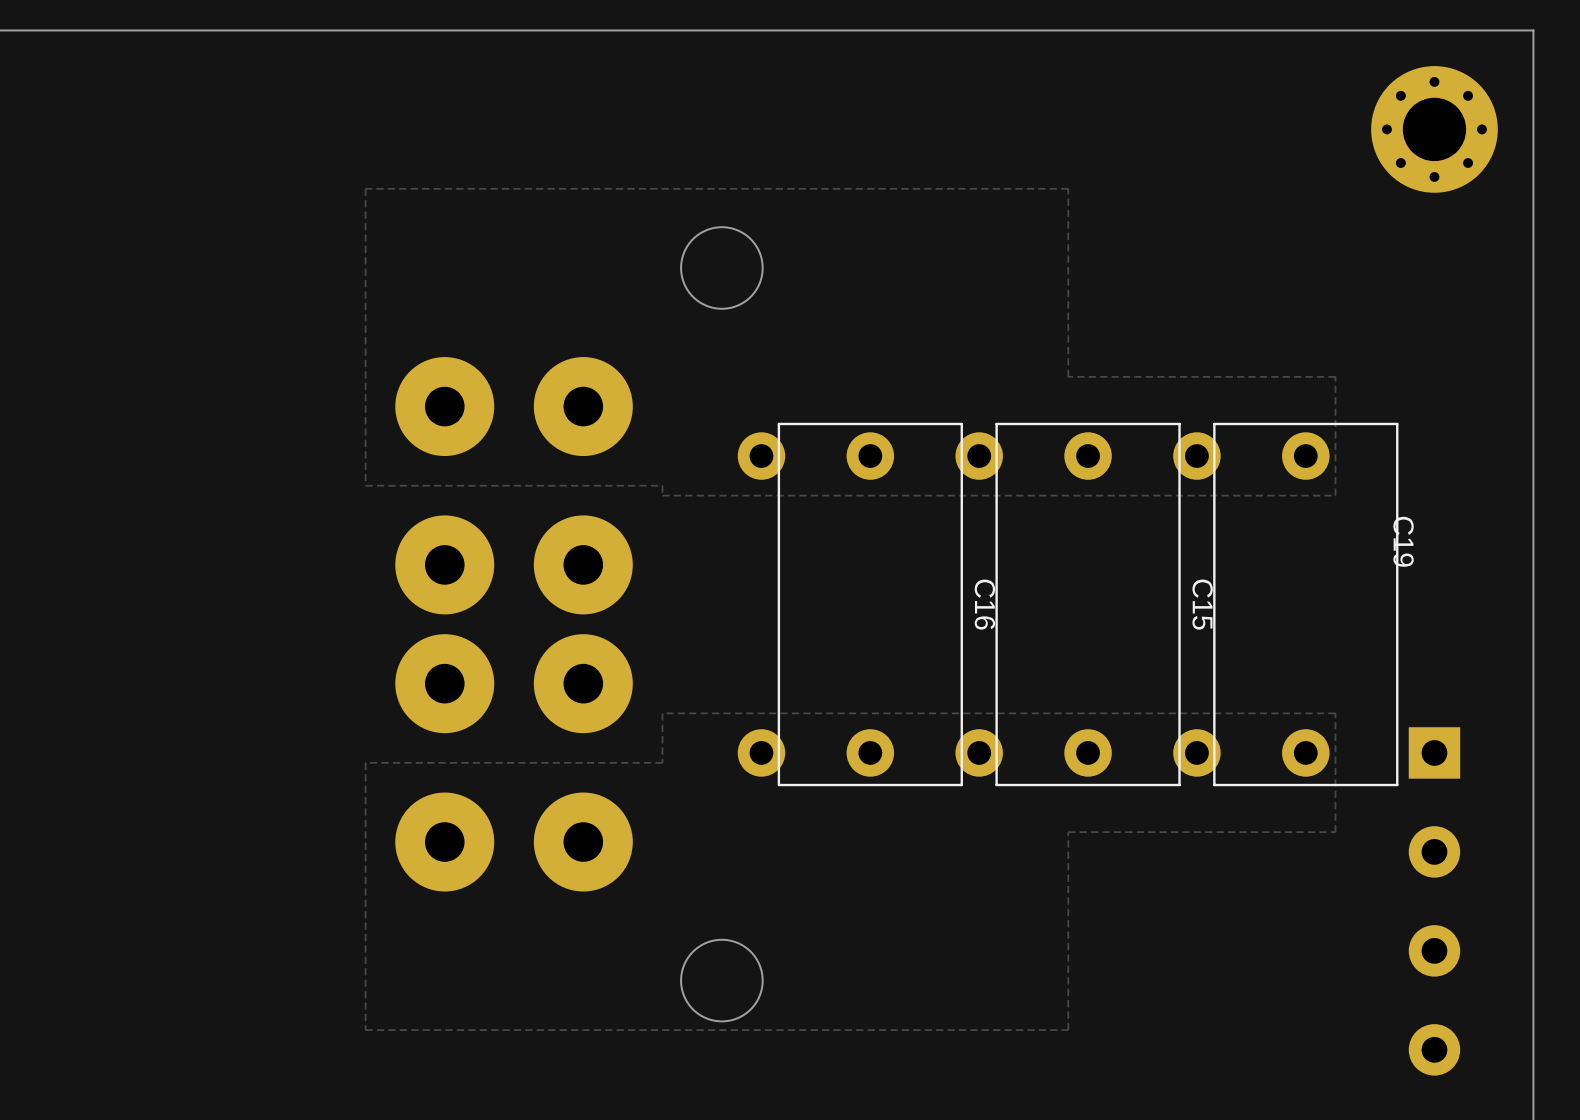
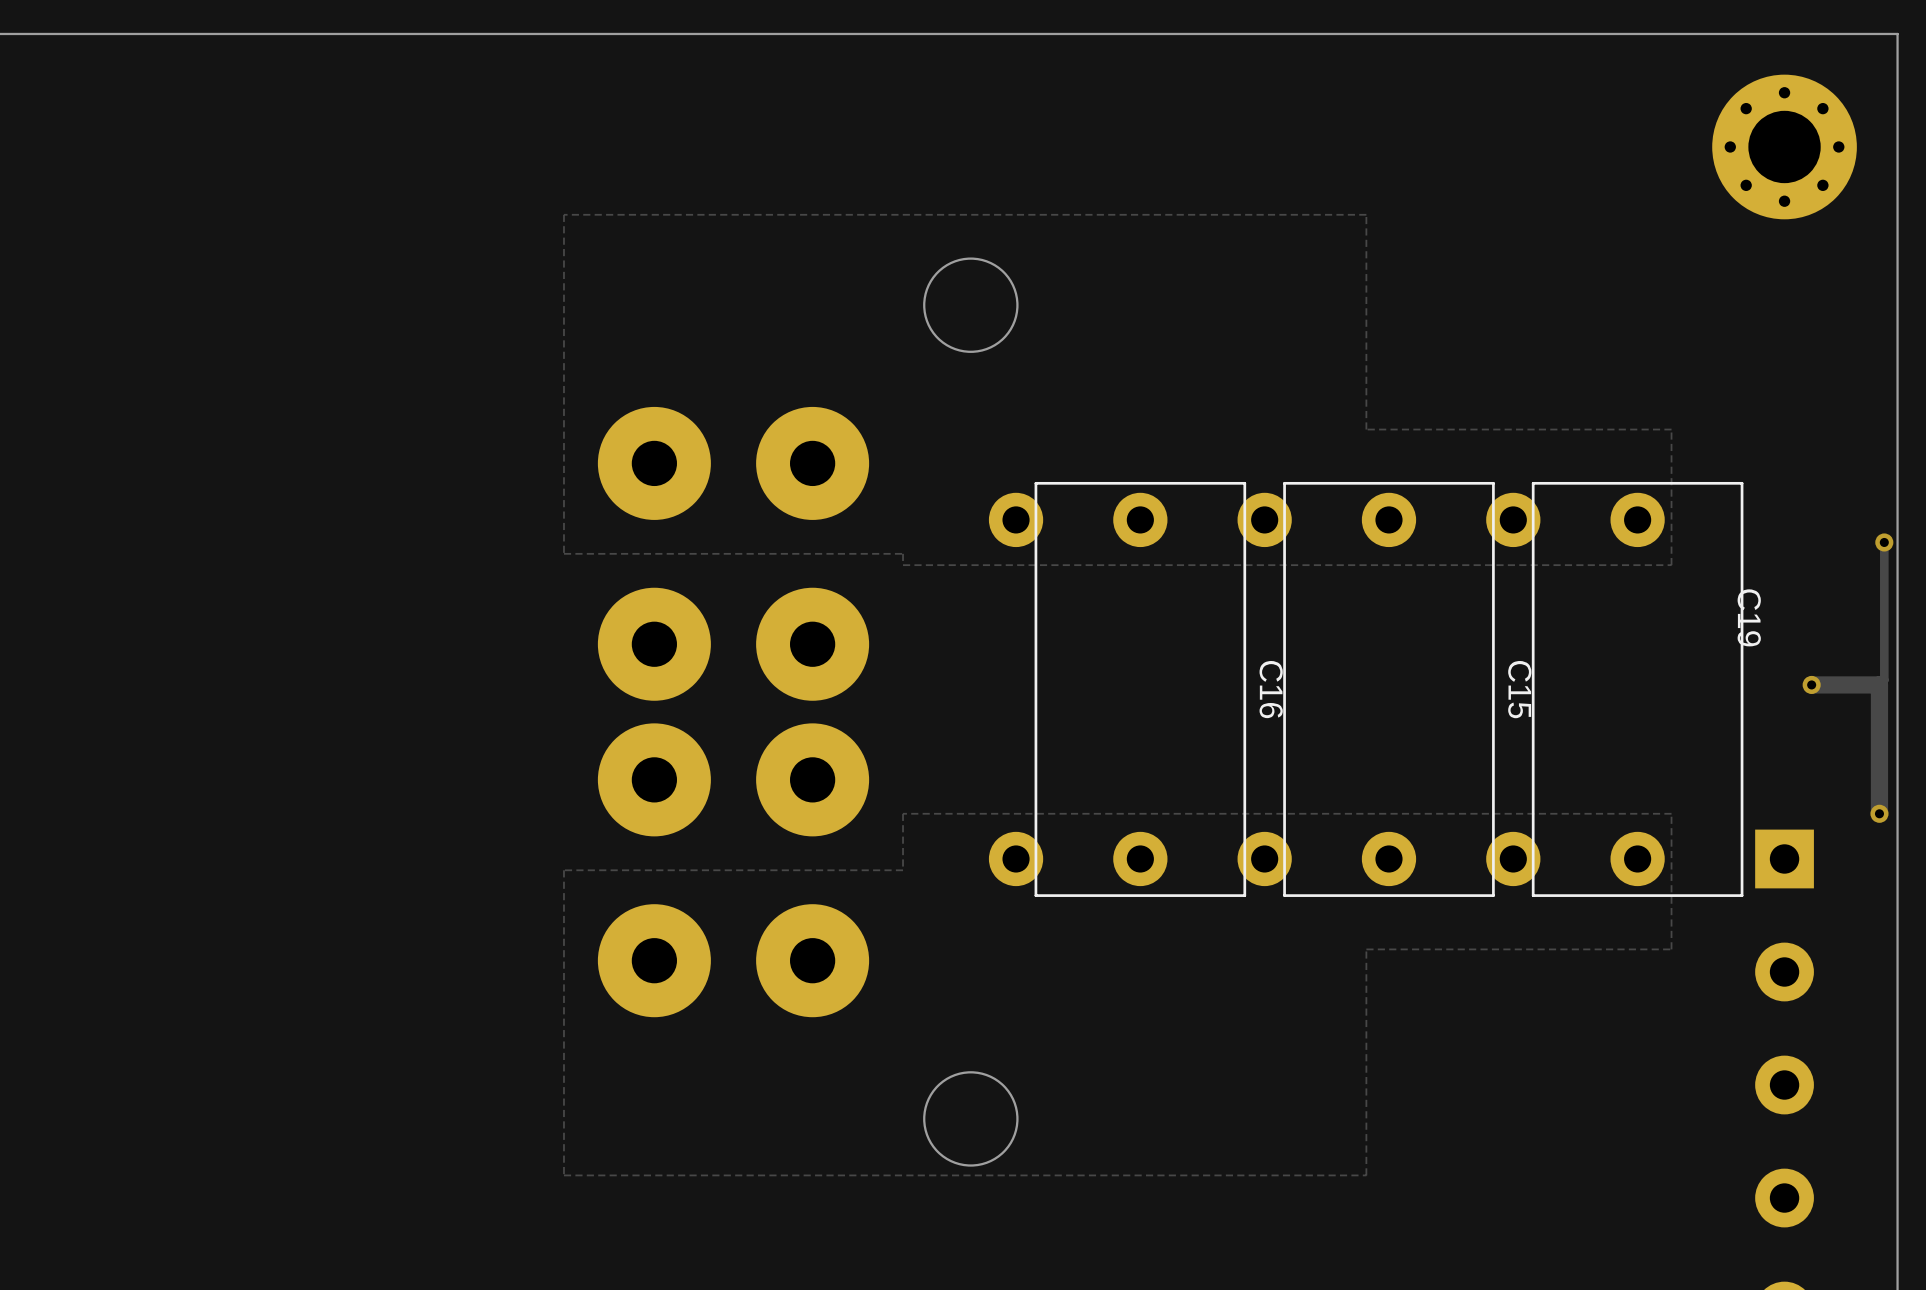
track: none -> (1884, 542) (1884, 680) (1879, 684)
via: none -> (1884, 542)
via: none -> (1811, 684)
track: none -> (1879, 684) (1879, 813)
track: none -> (1879, 684) (1811, 684)
via: none -> (1879, 813)

